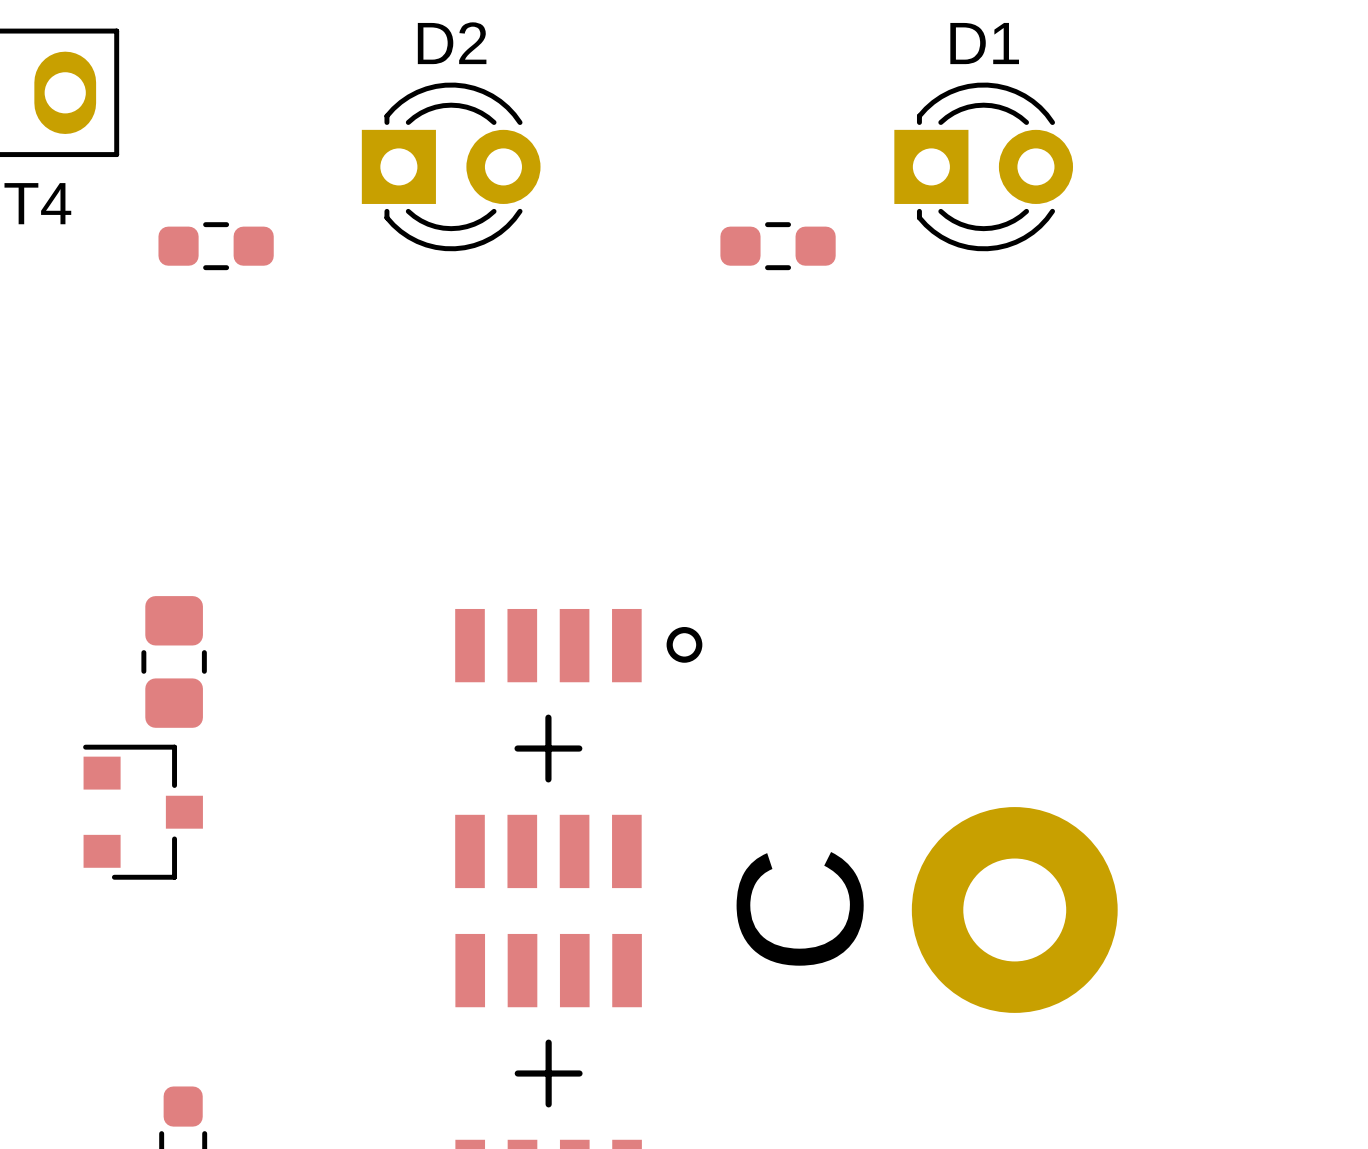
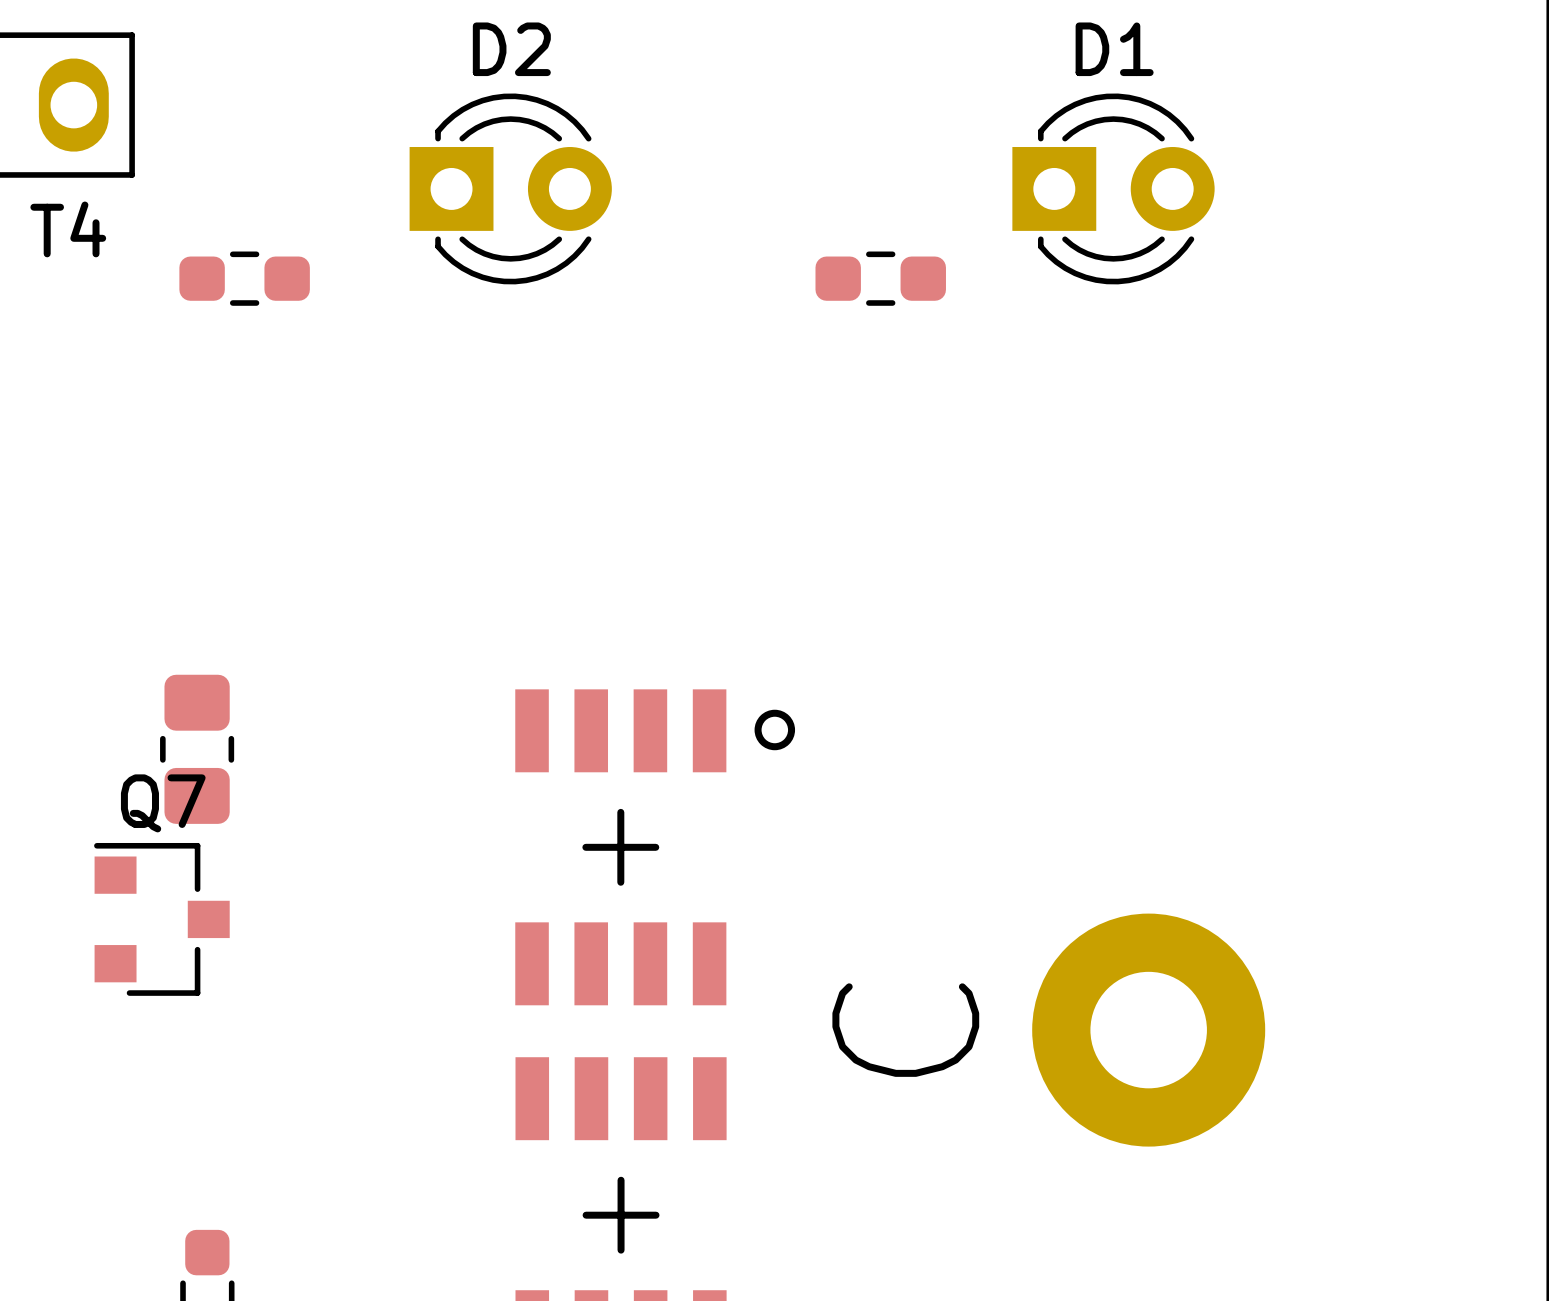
Q7 name: none -> Q7 (163, 803)

